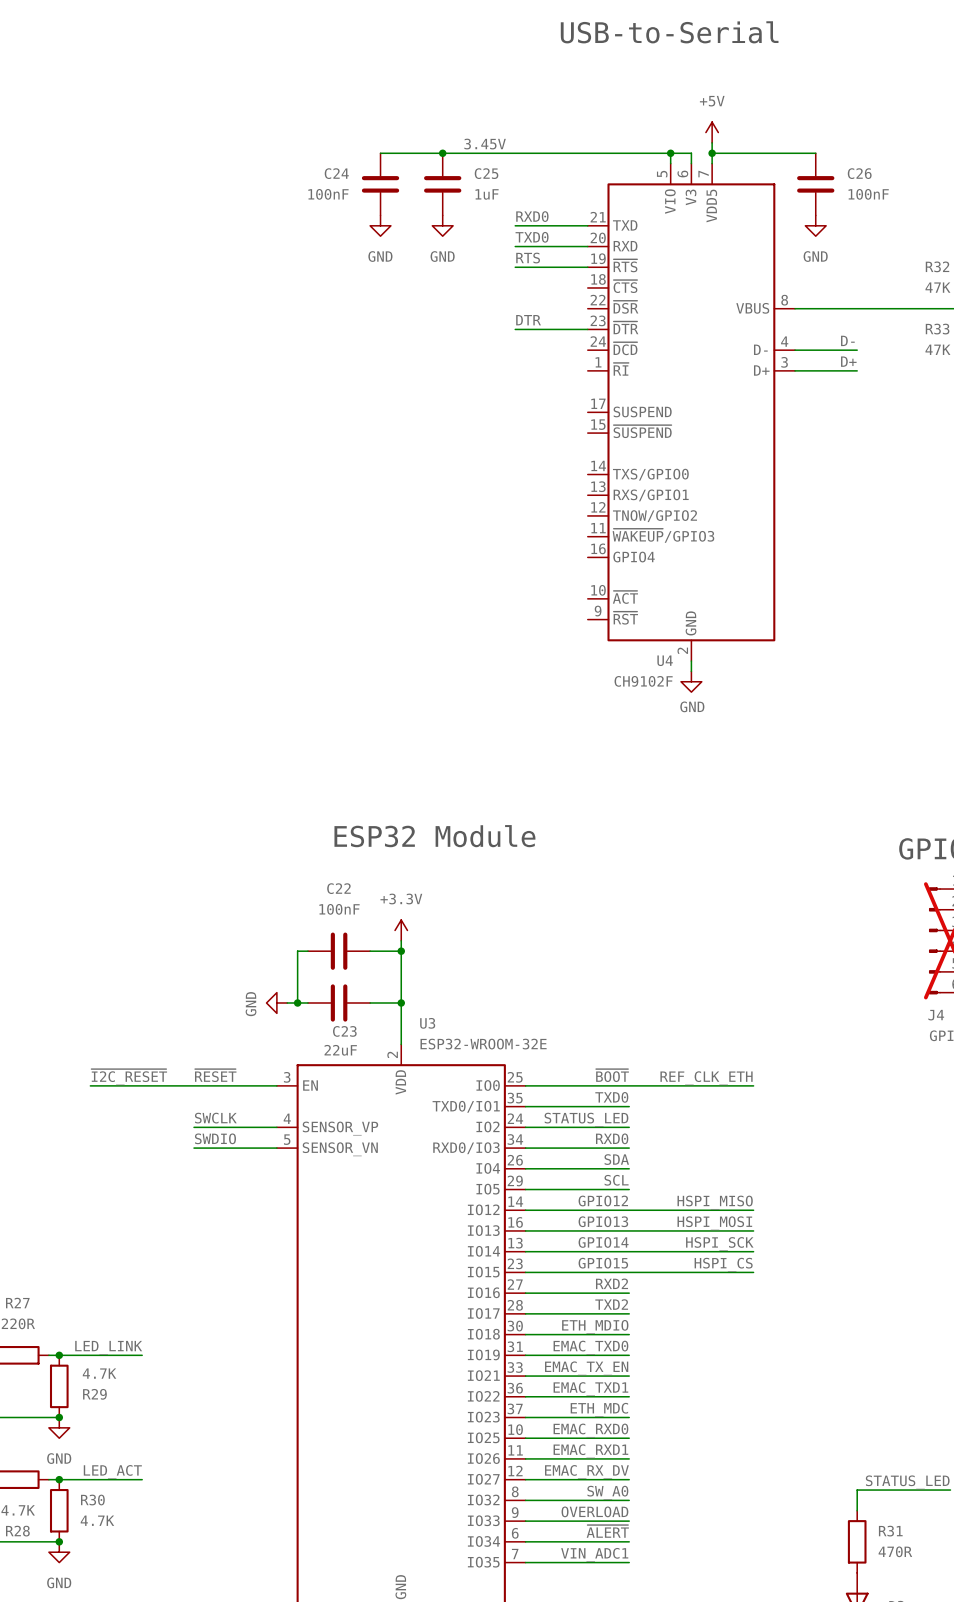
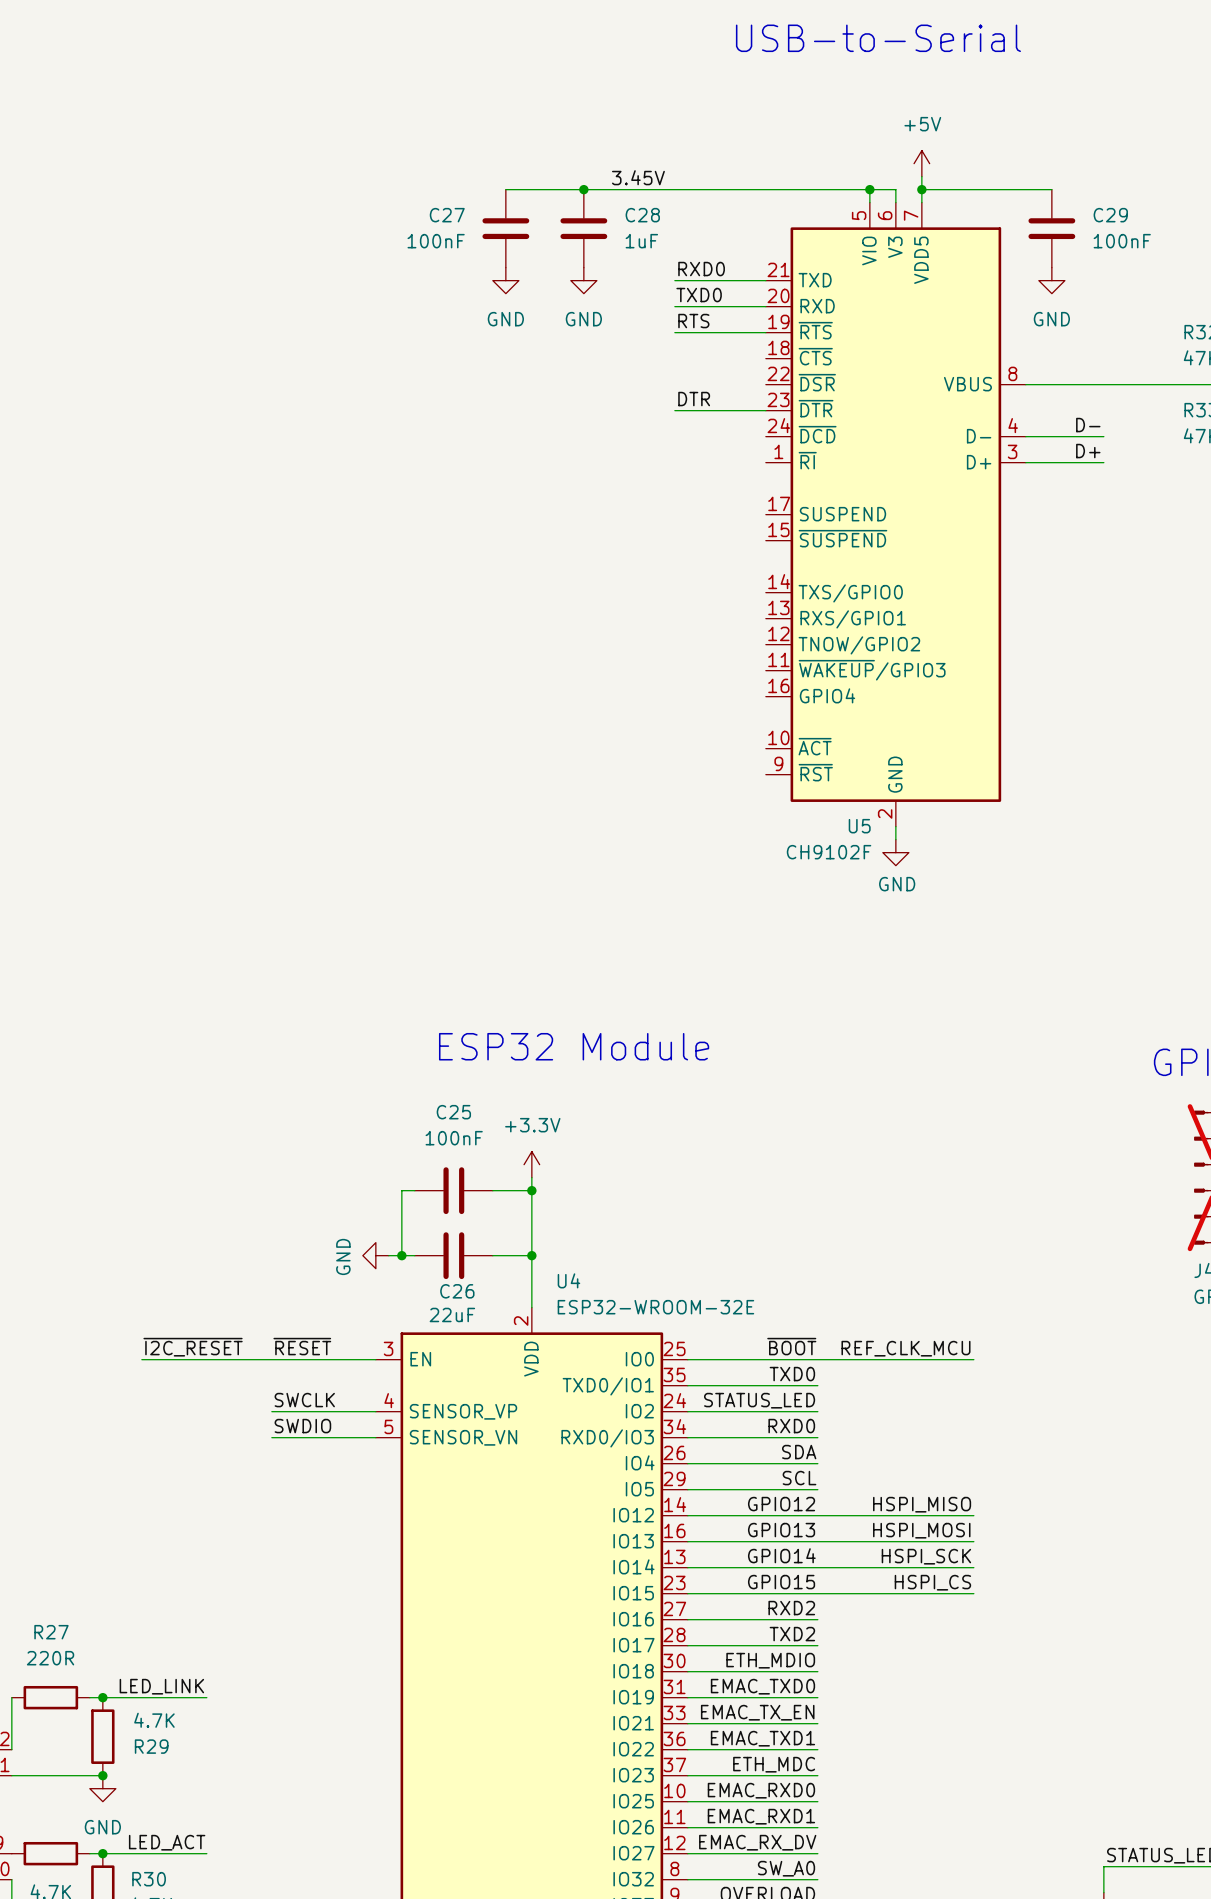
C24 name: C24 (336, 173) -> C27 (447, 215)
C25 name: C25 (486, 173) -> C28 (642, 215)
C26 name: C26 (859, 173) -> C29 (1110, 215)
U4 name: U4 (665, 660) -> U5 (859, 826)
C22 name: C22 (338, 888) -> C25 (453, 1112)
U3 name: U3 (427, 1023) -> U4 (568, 1280)
C23 name: C23 (344, 1031) -> C26 (457, 1291)
label: REF_CLK_ETH (706, 1078) -> REF_CLK_MCU (905, 1348)

